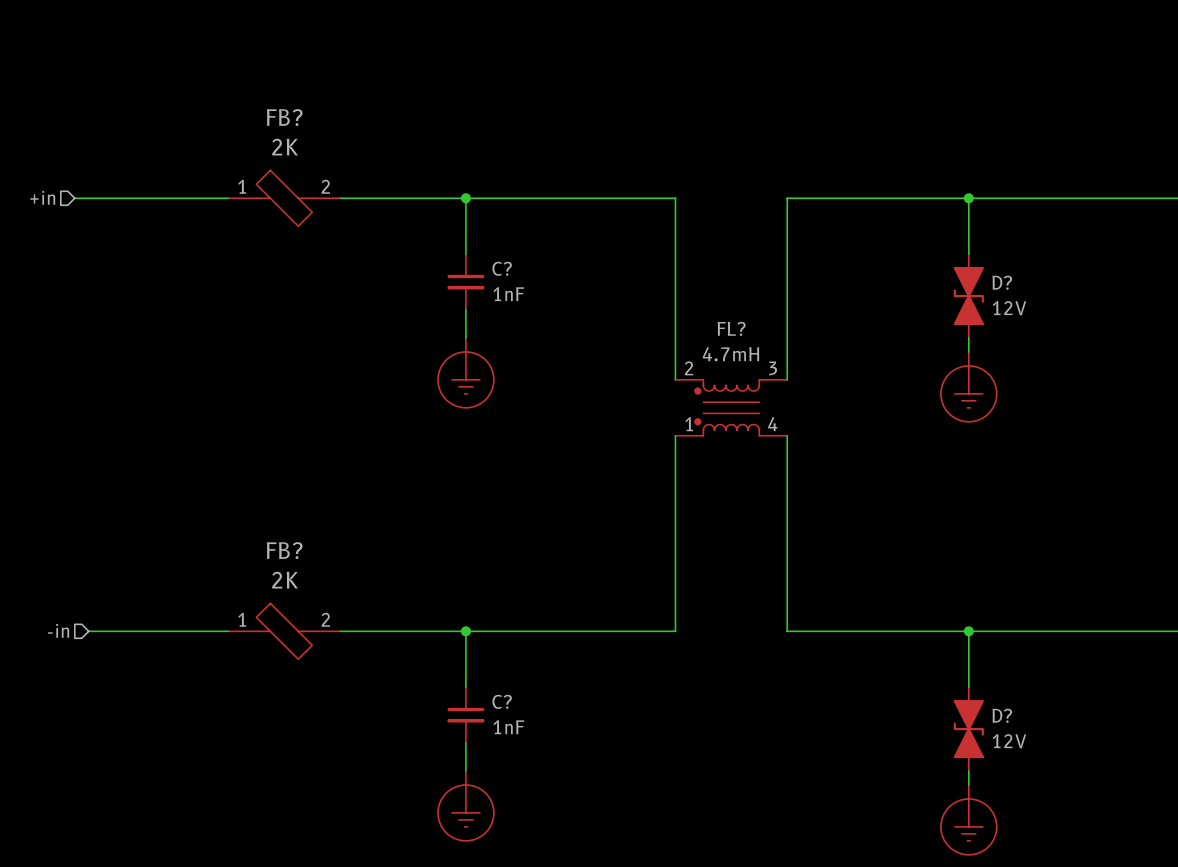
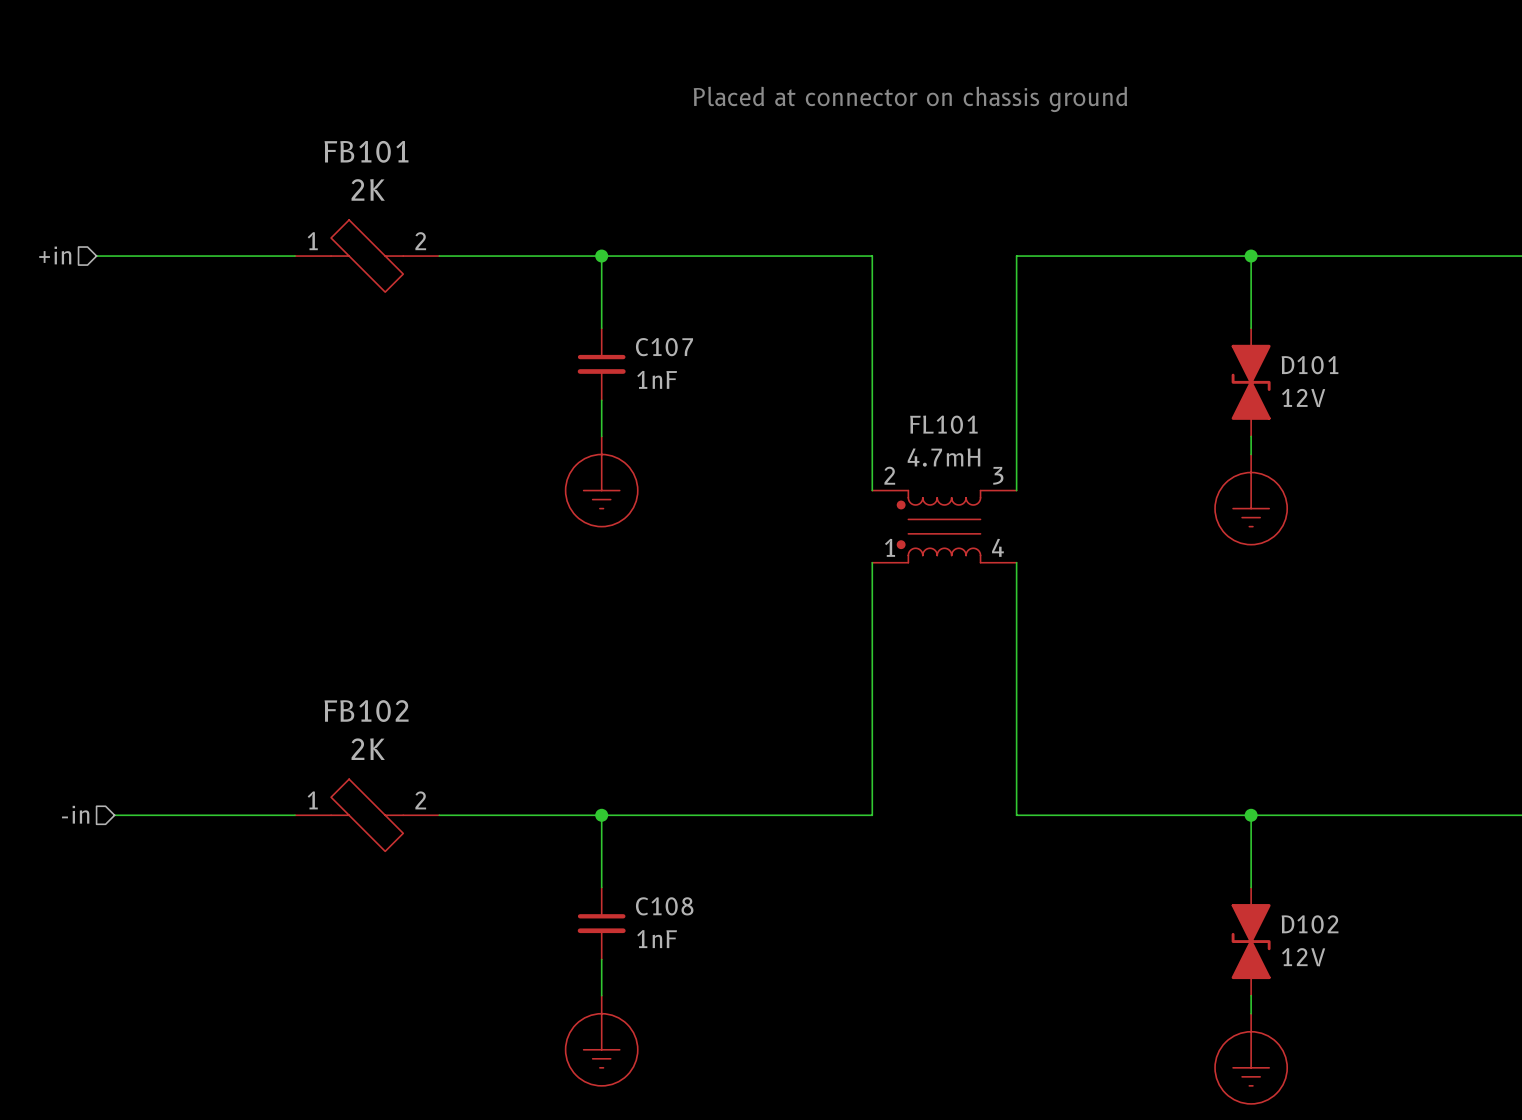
text: none -> Placed at connector on chassis ground (910, 99)
FB? name: FB? (284, 117) -> FB101 (366, 151)
C? name: C? (502, 268) -> C107 (664, 347)
D? name: D? (1002, 282) -> D101 (1310, 365)
FL? name: FL? (731, 328) -> FL101 (943, 424)
FB? name: FB? (284, 550) -> FB102 (366, 711)
C? name: C? (502, 701) -> C108 (664, 906)
D? name: D? (1002, 715) -> D102 (1310, 924)

